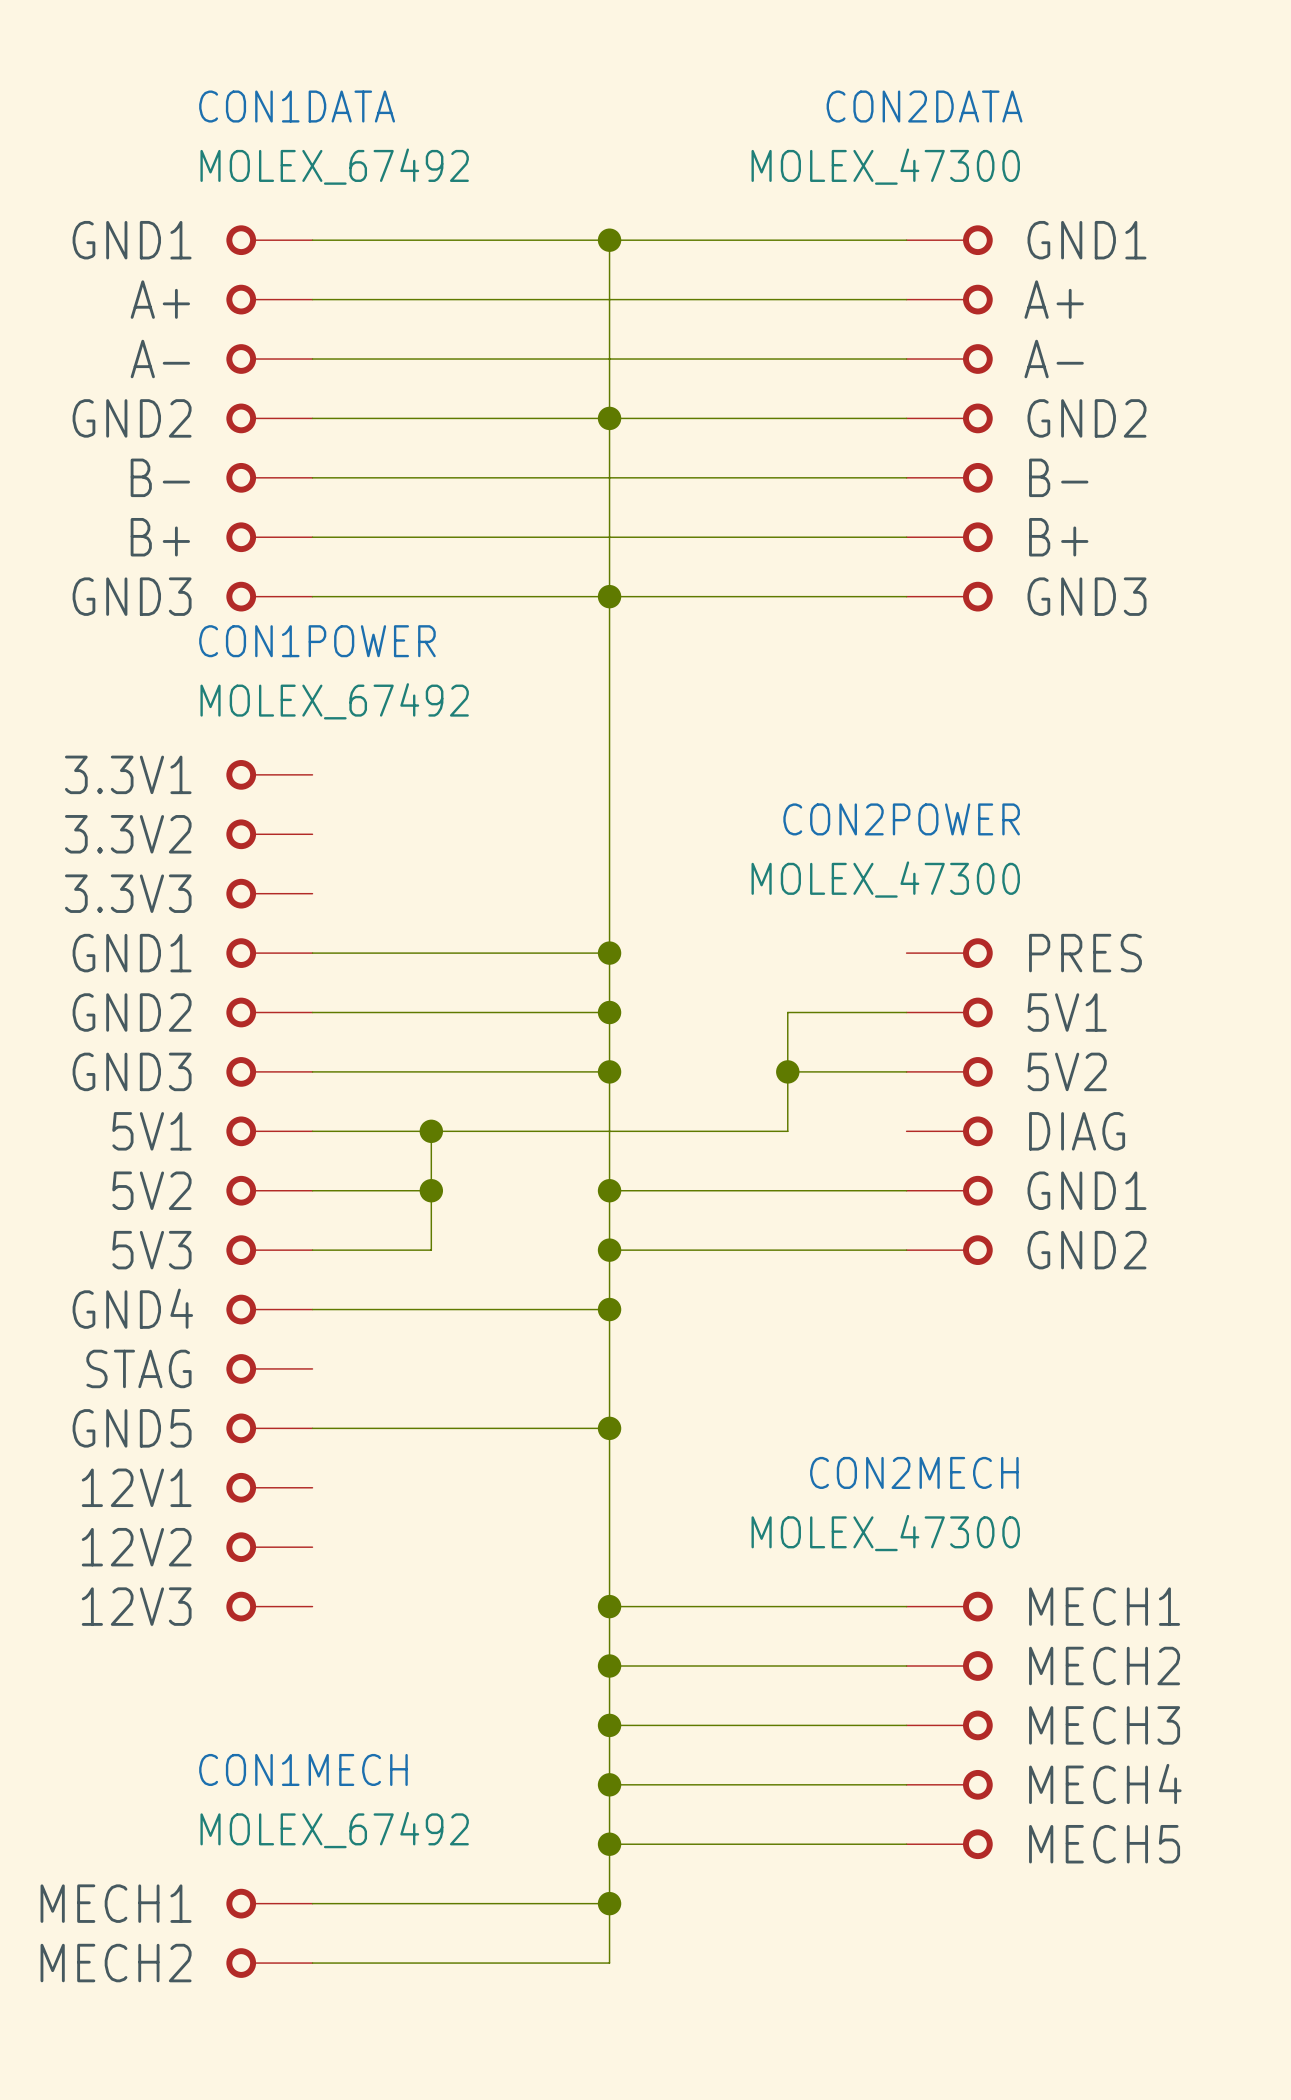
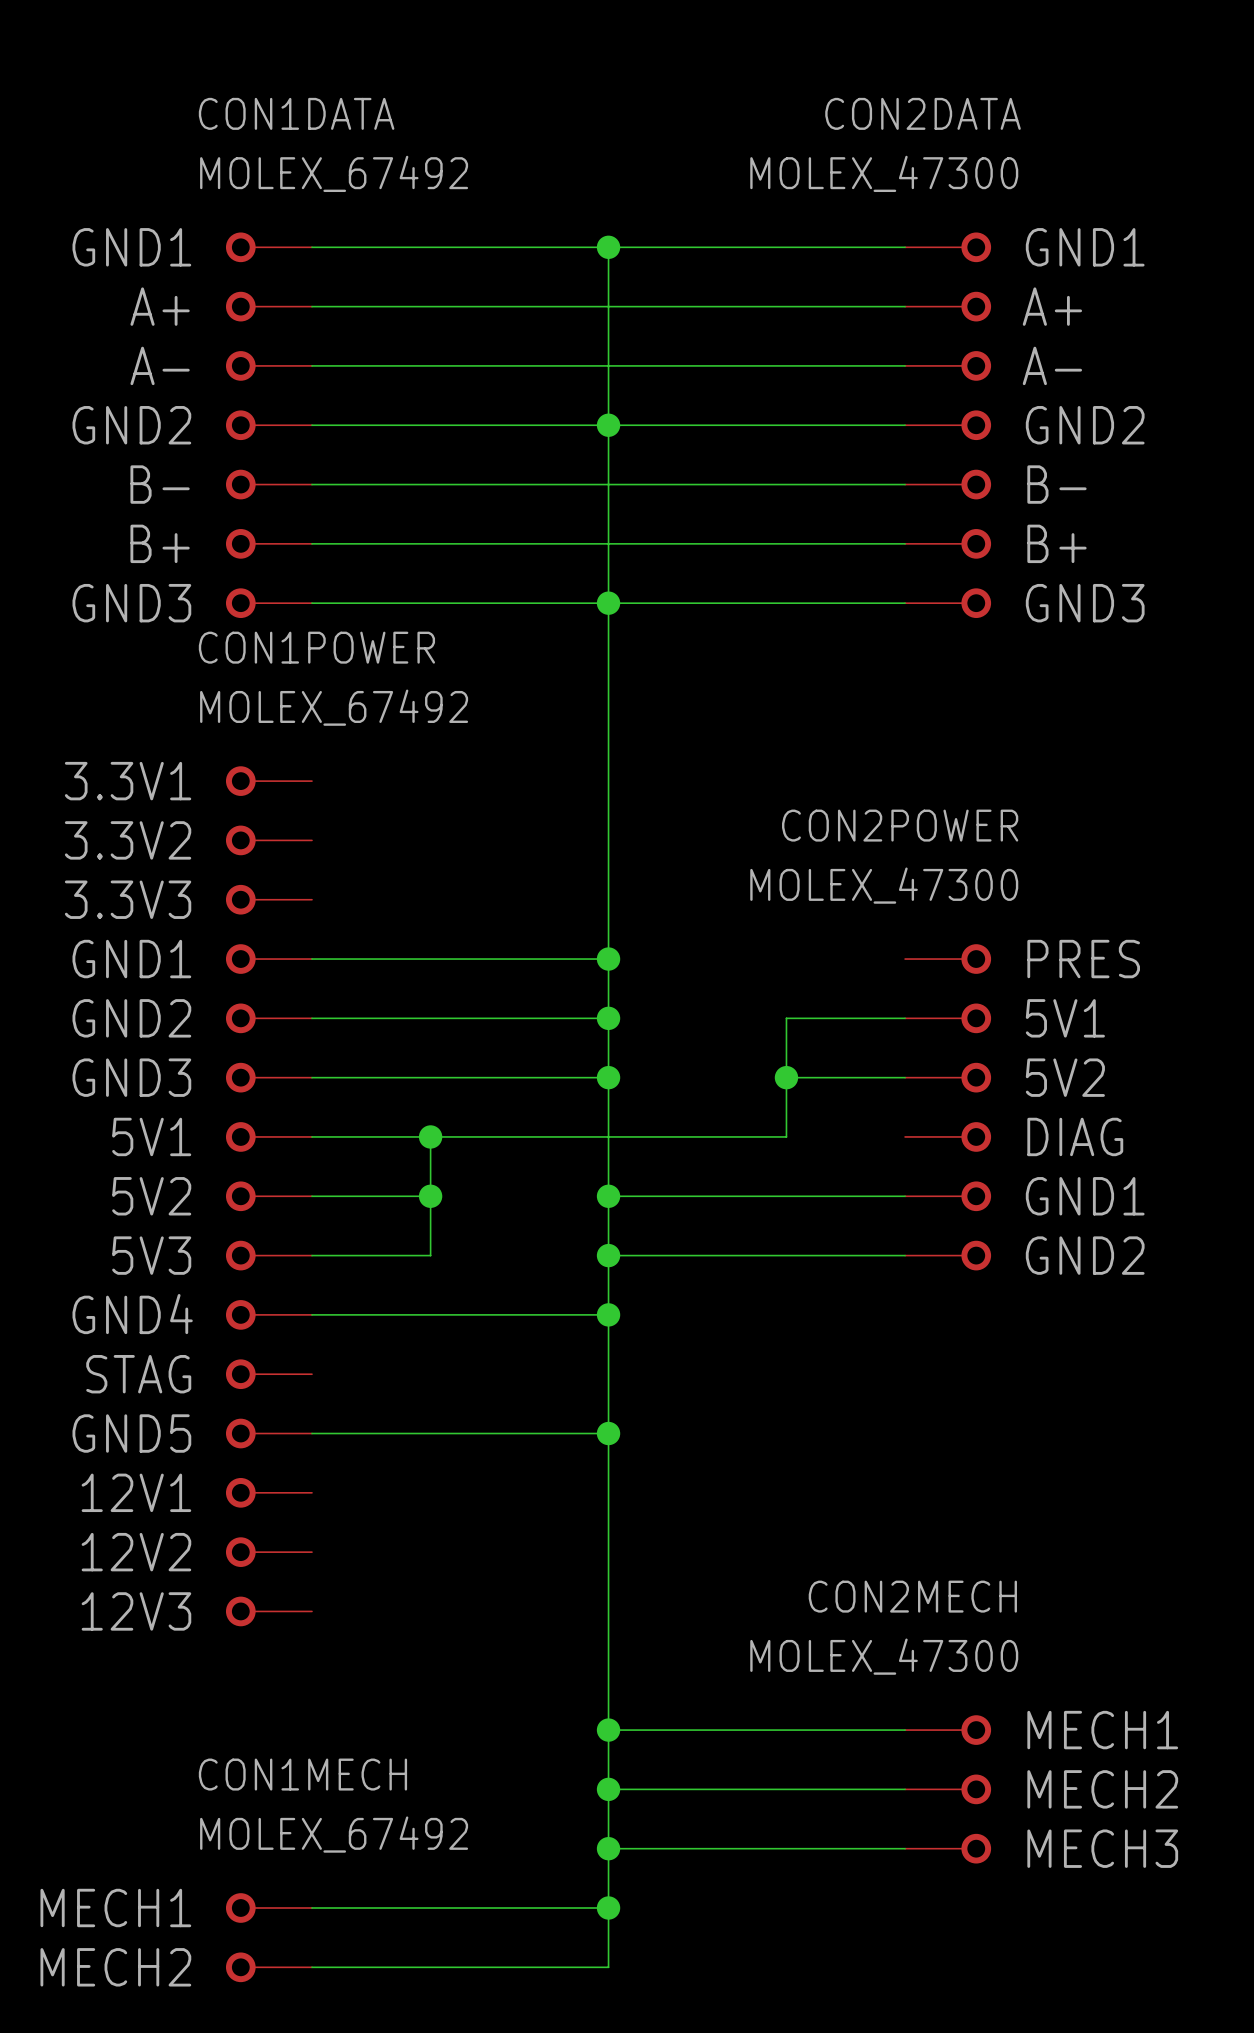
CON2MECH name position: CON2MECH (914, 1472) -> CON2MECH (912, 1596)
CON2MECH value position: MOLEX_47300 (885, 1533) -> MOLEX_47300 (884, 1656)
CON2MECH symbol: [906, 1591, 993, 1860] -> [905, 1715, 992, 1864]
wire: (609, 1606) (906, 1606) -> none
junction: (609, 1606) -> none
wire: (609, 1666) (906, 1666) -> none
junction: (609, 1666) -> none

